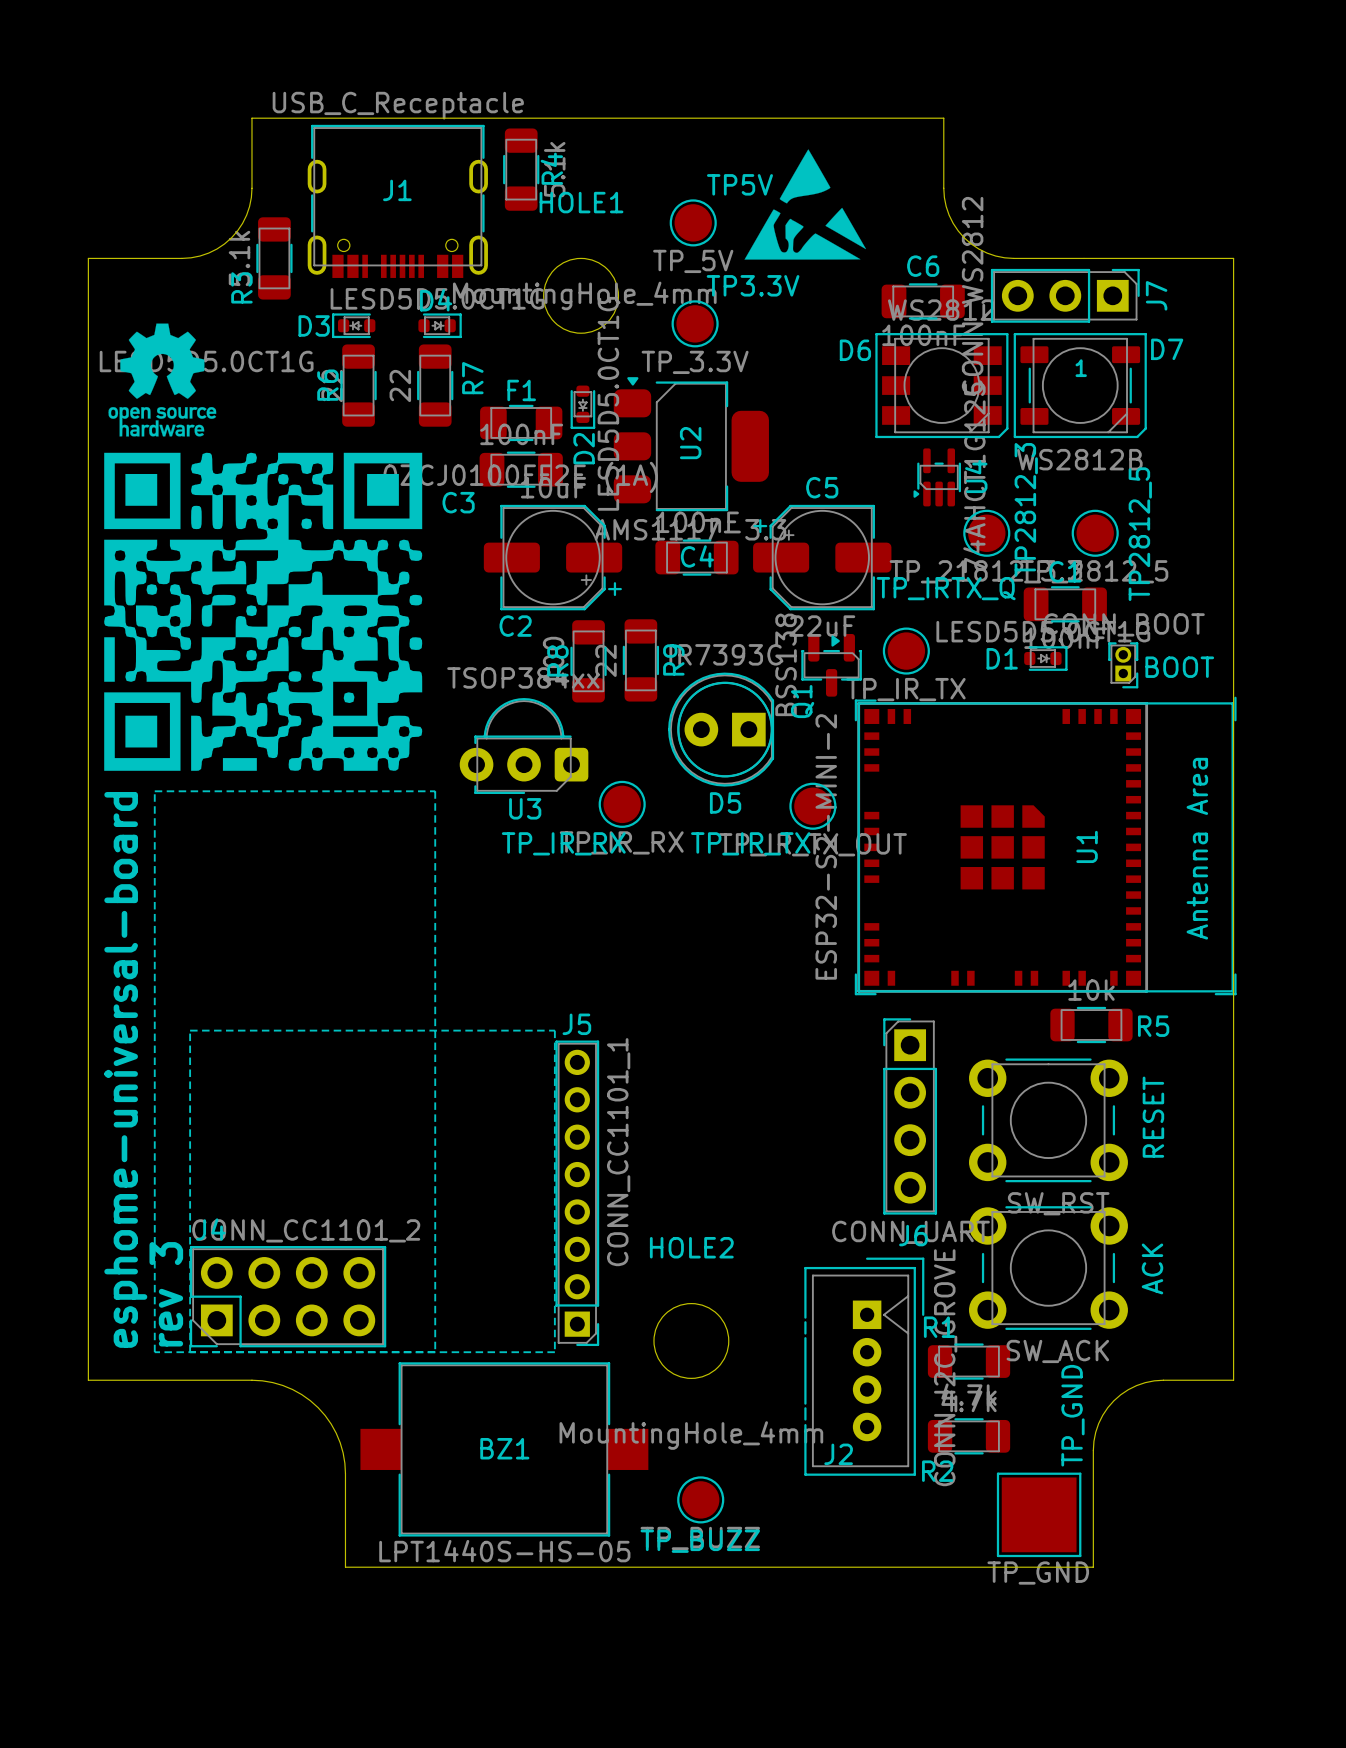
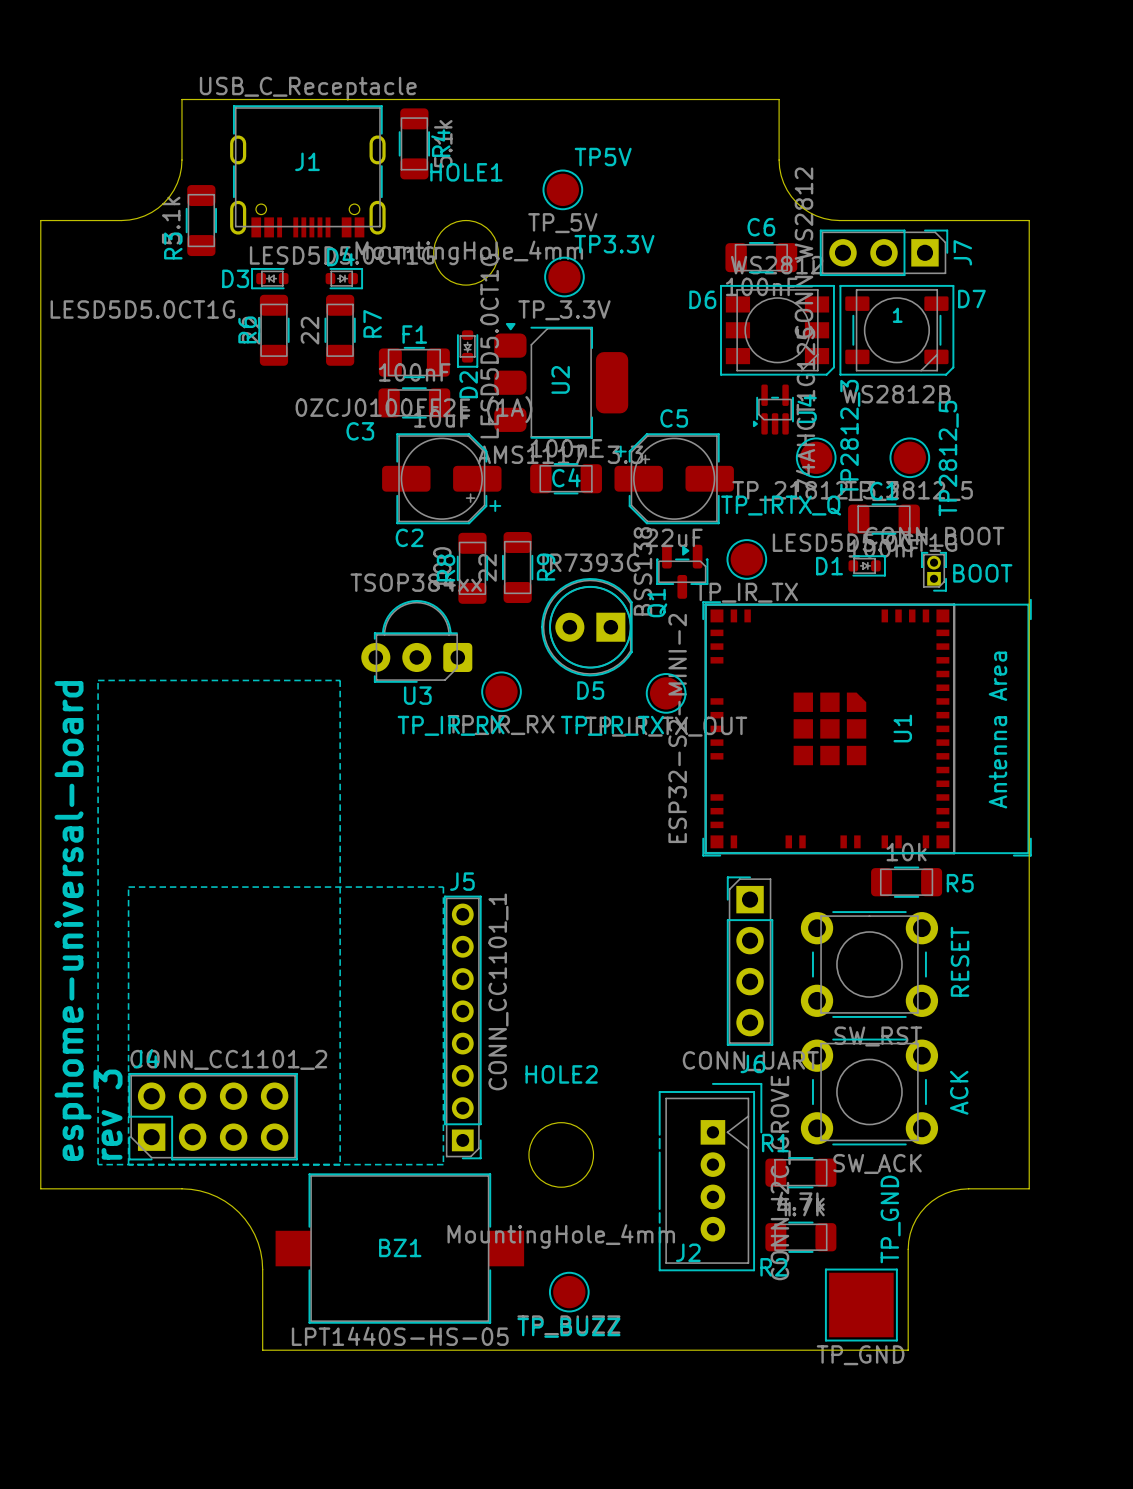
drawing: [744, 149, 866, 260] -> none
drawing: [104, 323, 423, 771] -> none

